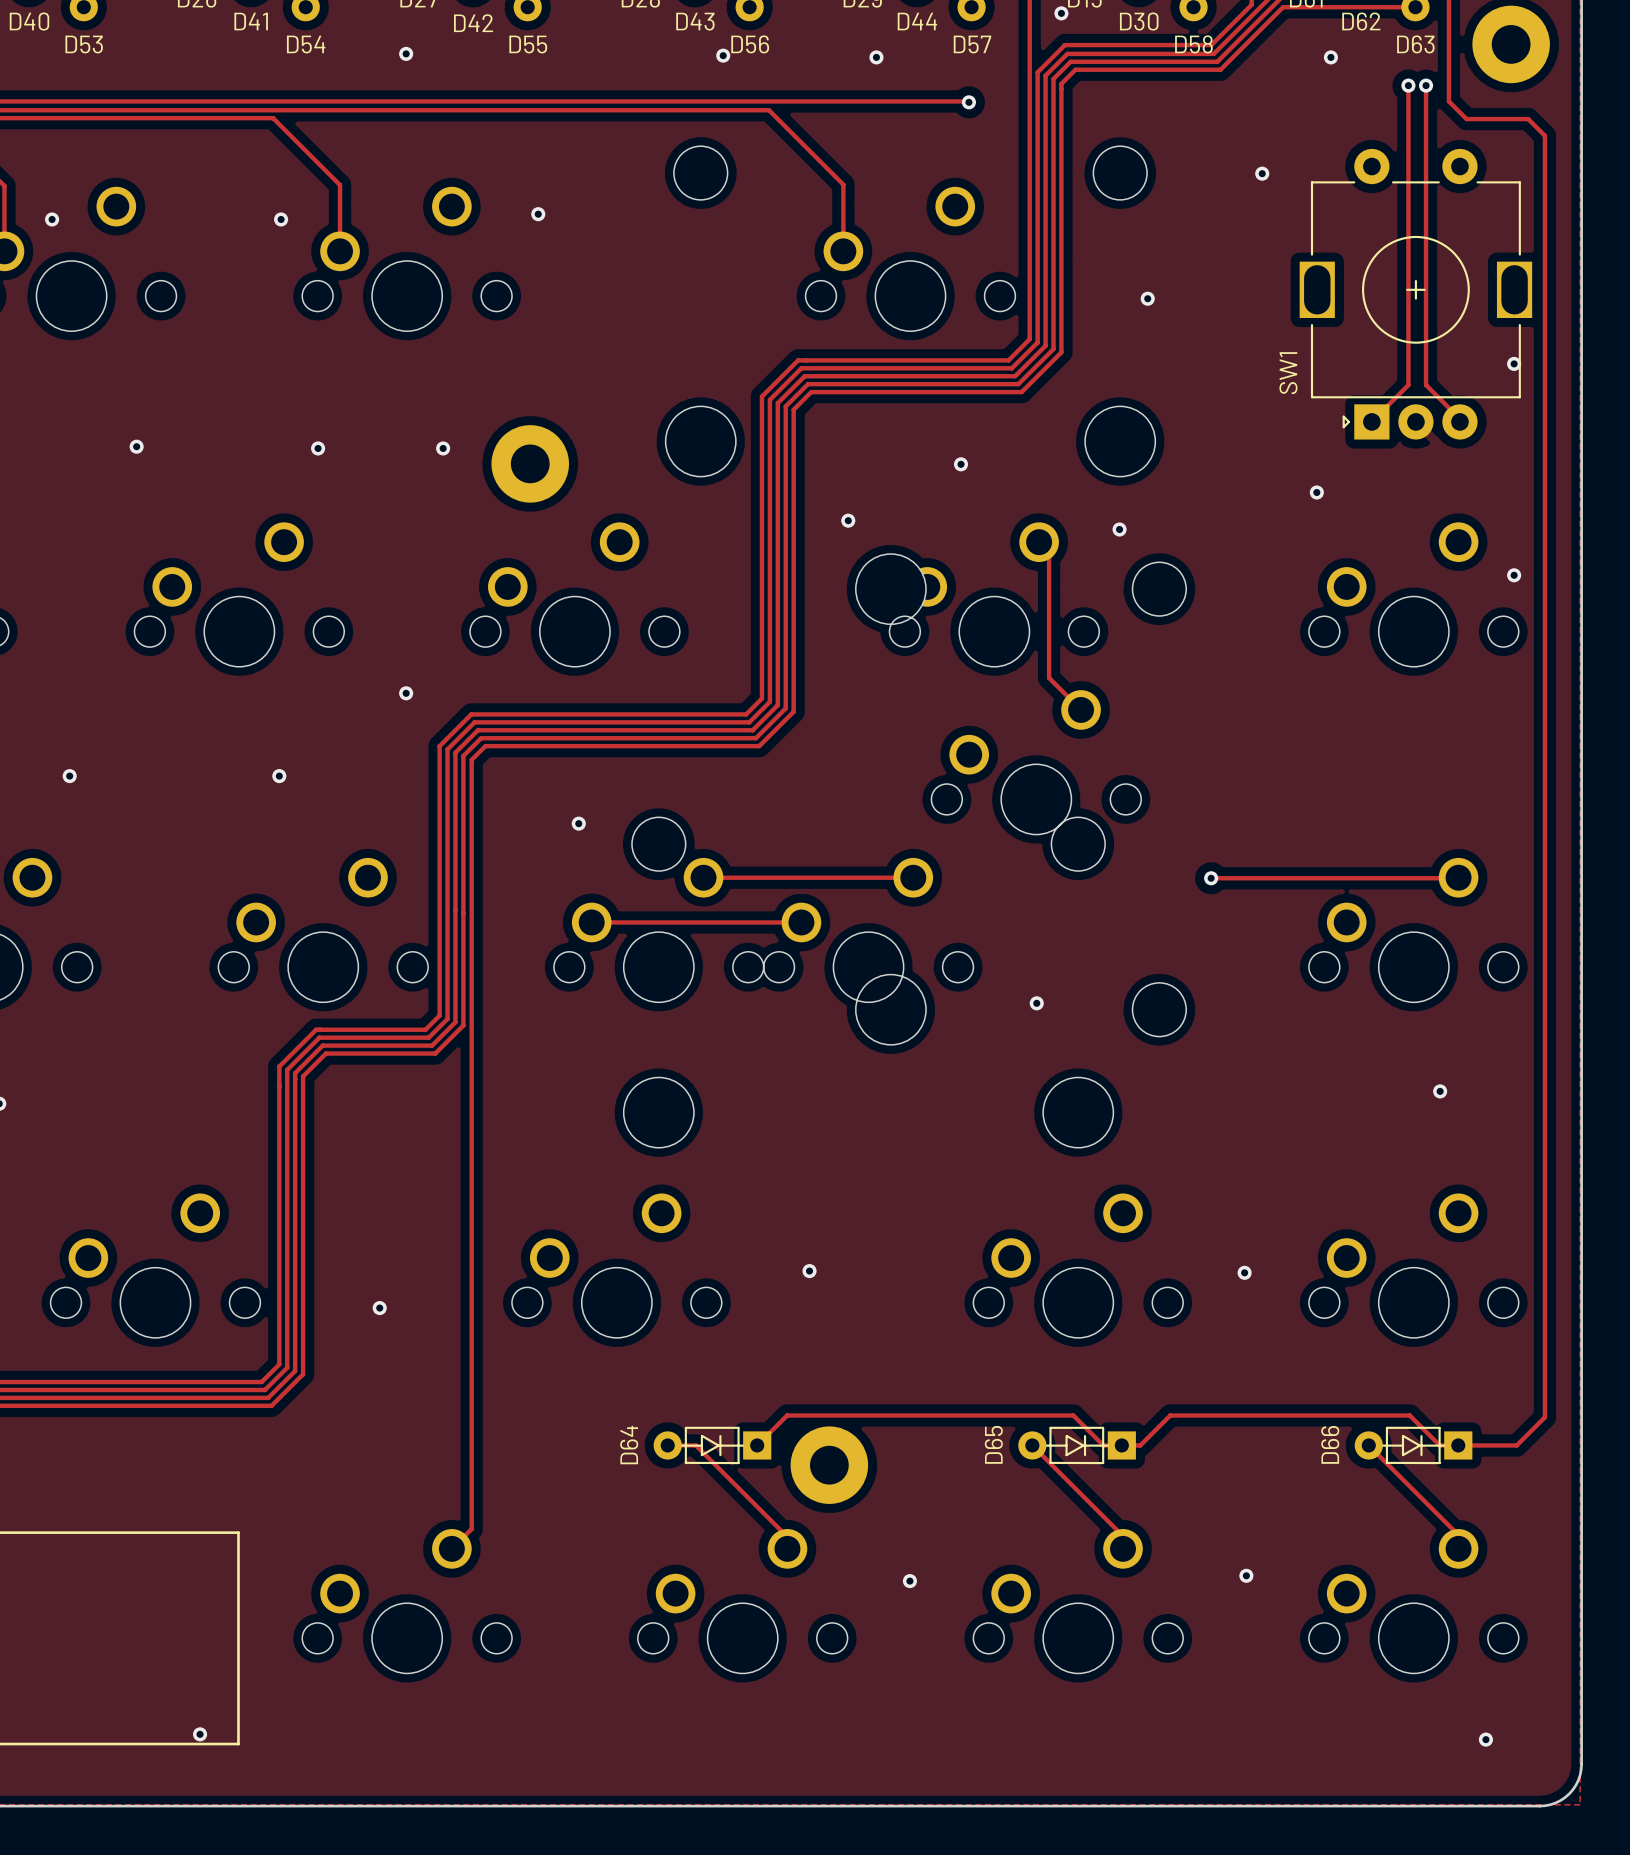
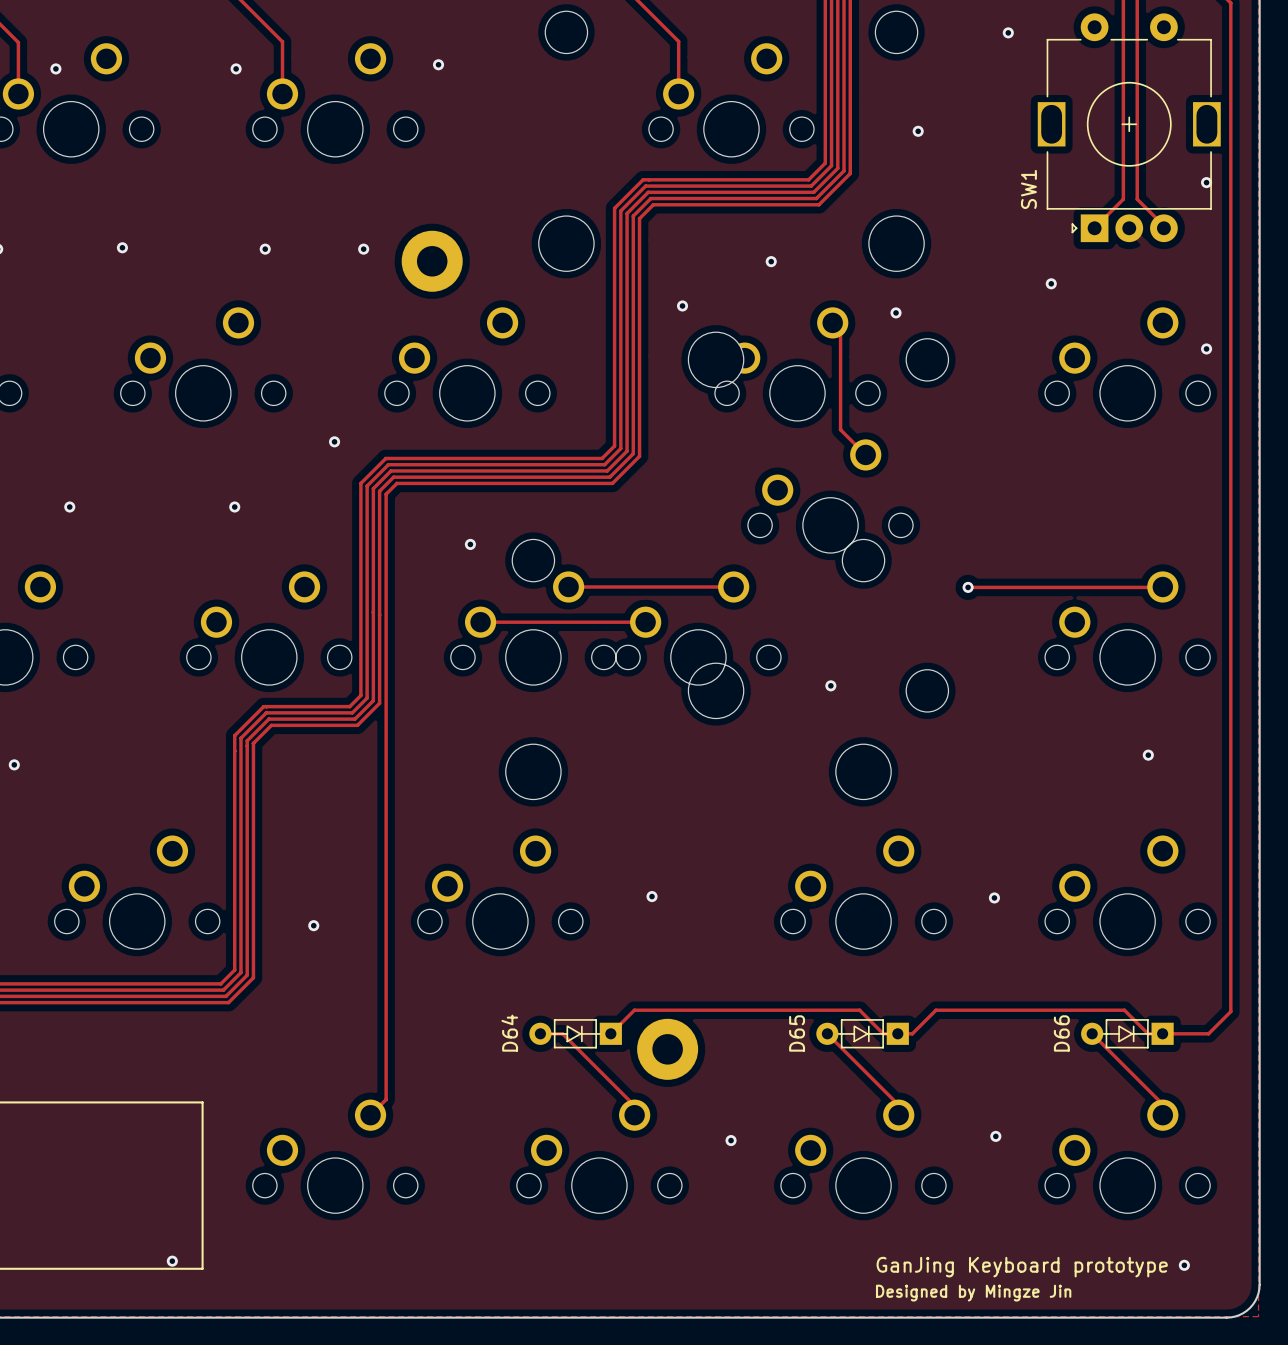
text: none -> GanJing Keyboard prototype (1022, 1267)
text: none -> Designed by Mingze Jin (973, 1293)

